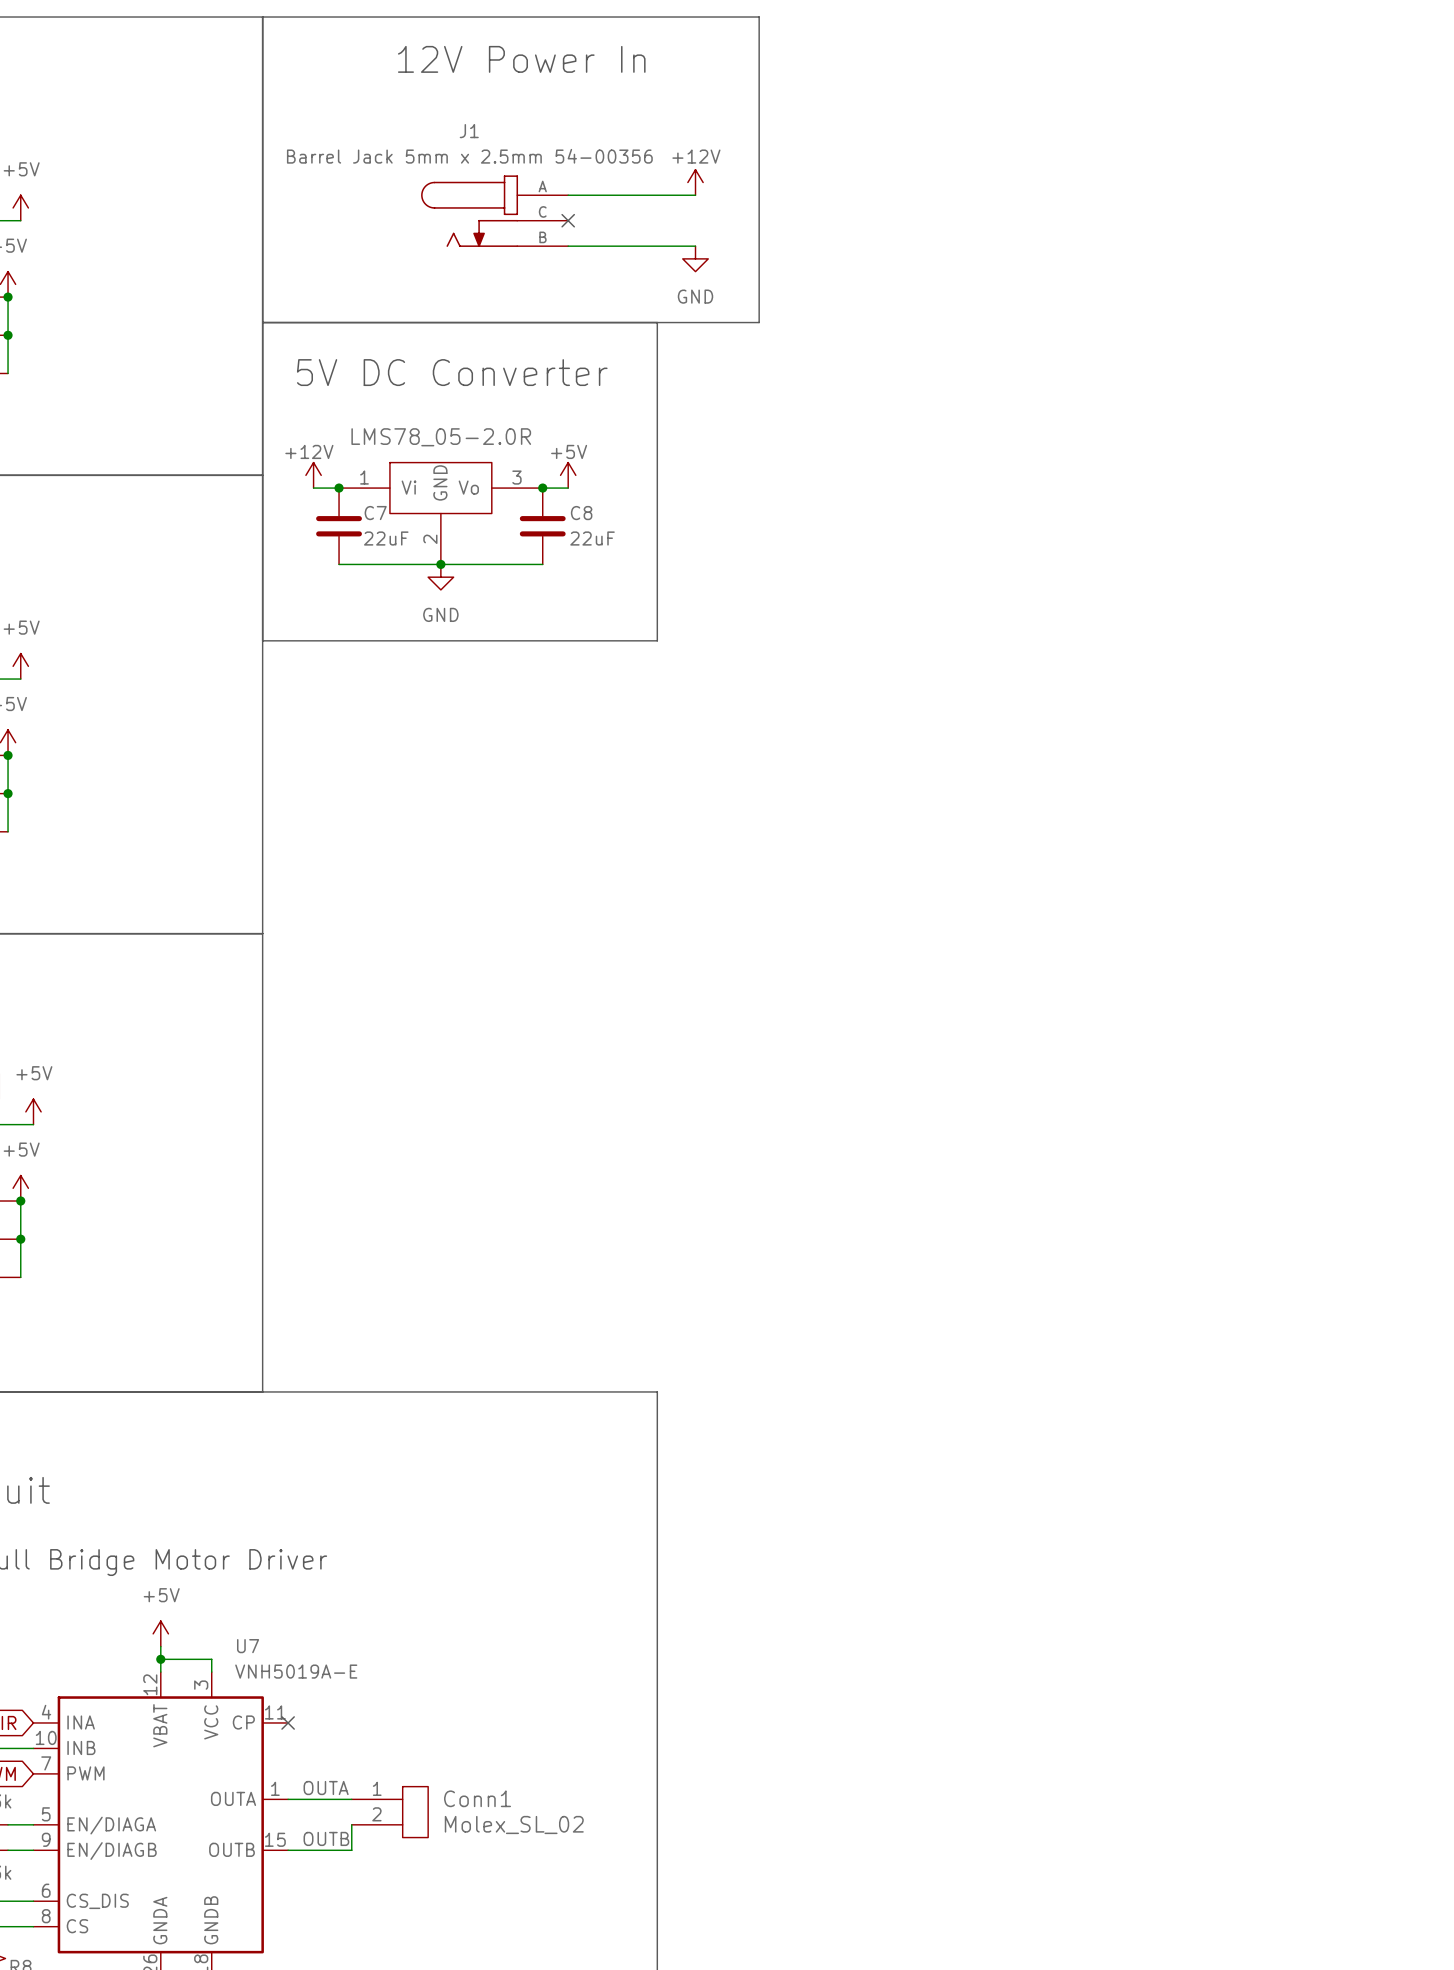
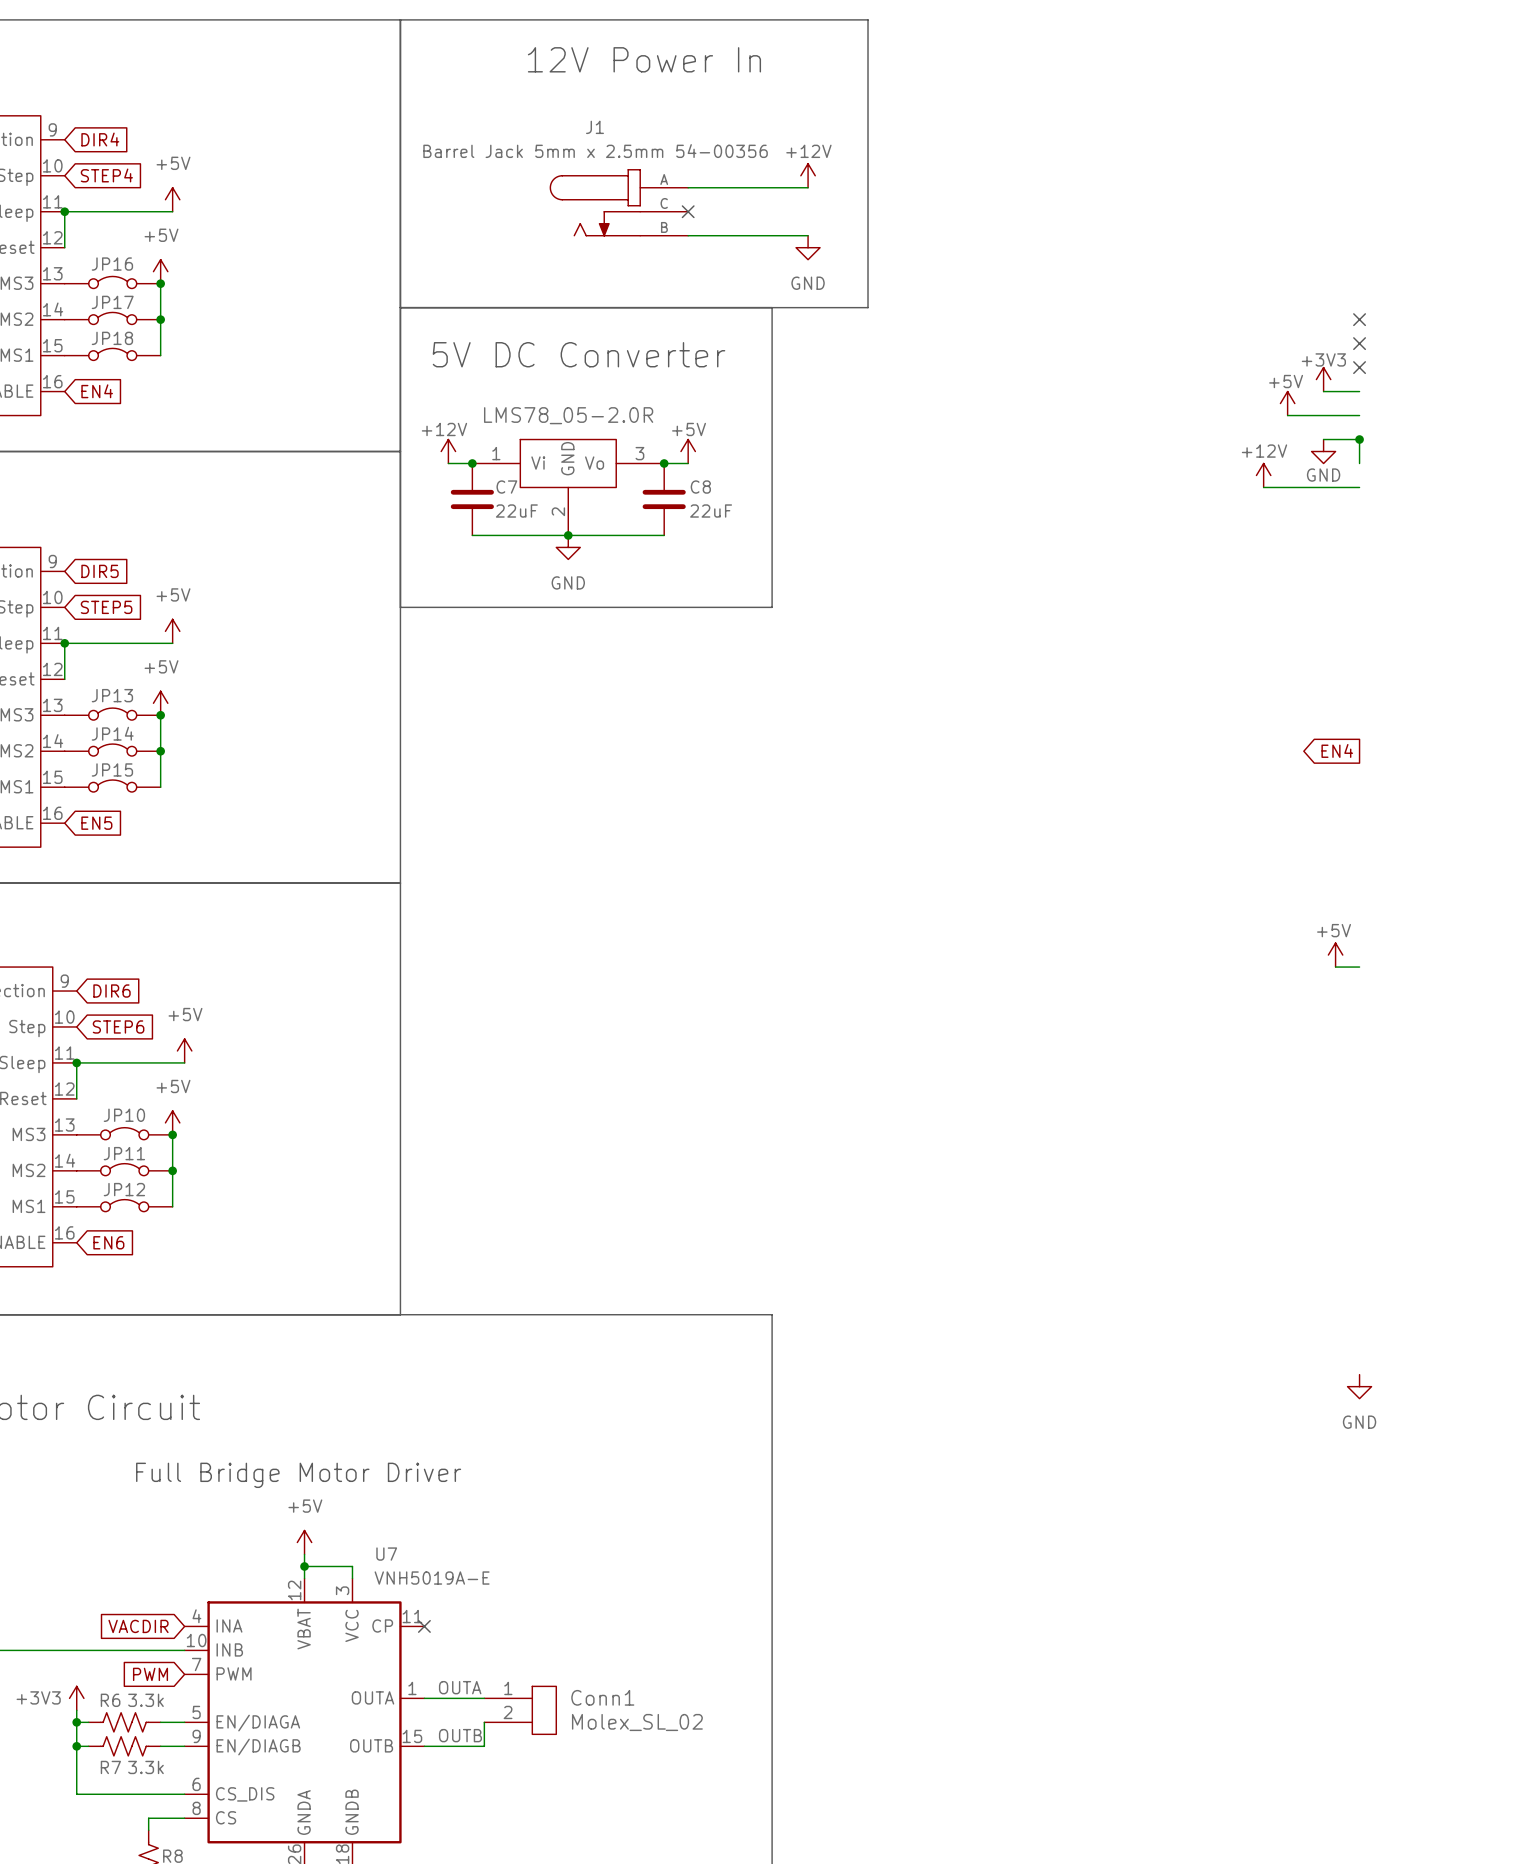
no-connect mark: none -> (1359, 319)
no-connect mark: none -> (1359, 343)
no-connect mark: none -> (1359, 367)
power symbol: none -> +3V3 (1323, 379)
wire: none -> (1323, 391) (1359, 391)
power symbol: none -> +5V (1287, 403)
wire: none -> (1287, 415) (1359, 415)
wire: none -> (1323, 439) (1359, 439) (1359, 463)
junction: none -> (1359, 439)
power symbol: none -> GND (1323, 451)
power symbol: none -> +12V (1263, 475)
wire: none -> (1263, 487) (1359, 487)
global label: none -> EN4 (1337, 750)
power symbol: none -> +5V (1335, 955)
wire: none -> (1335, 967) (1359, 967)
power symbol: none -> GND (1359, 1386)

